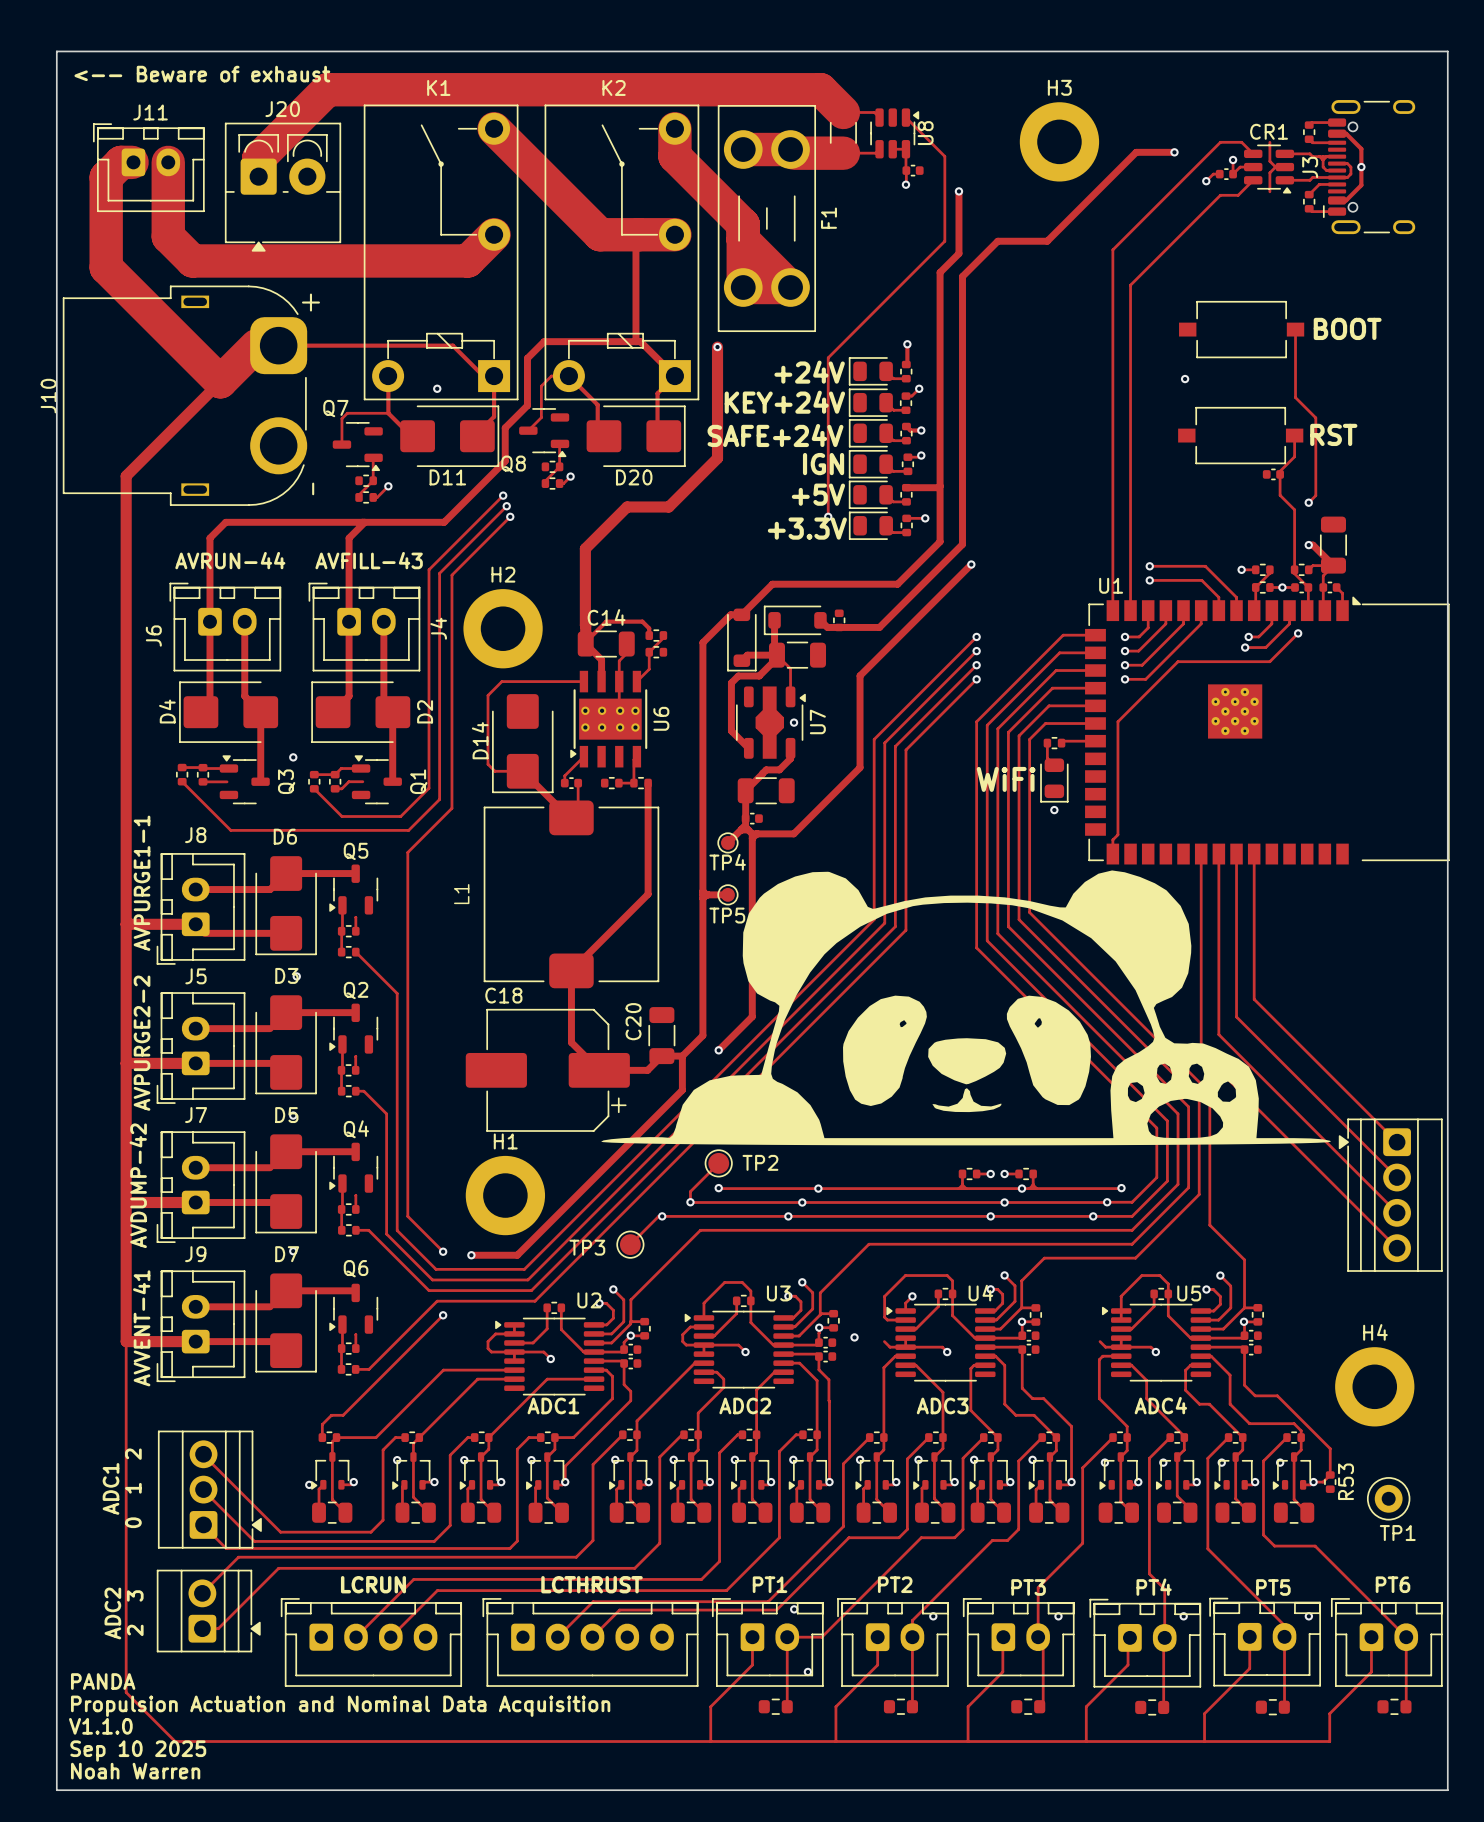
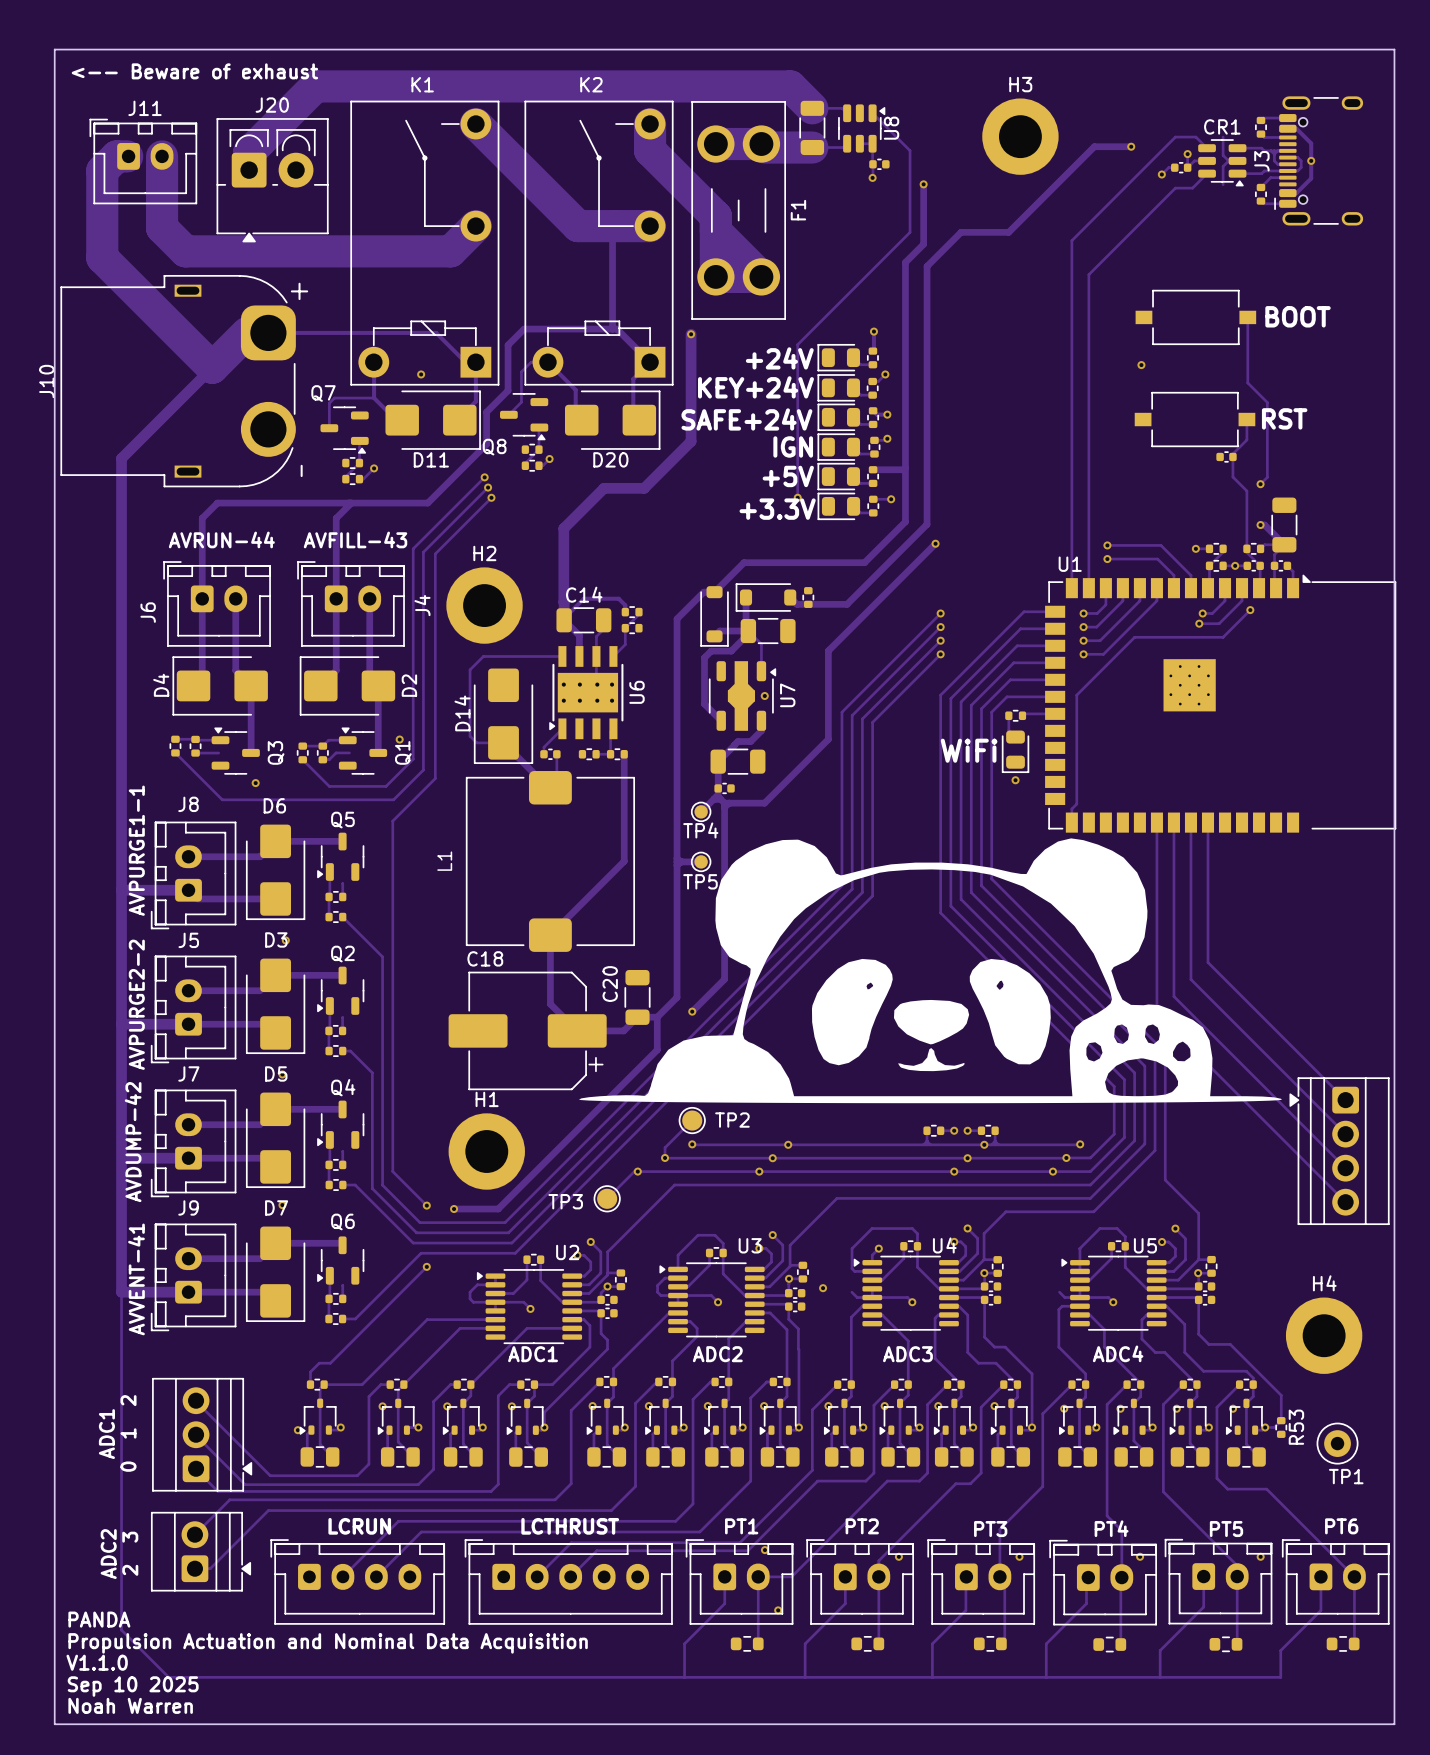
via: (293, 757) -> none
via: none -> (399, 739)
via: none -> (255, 783)

